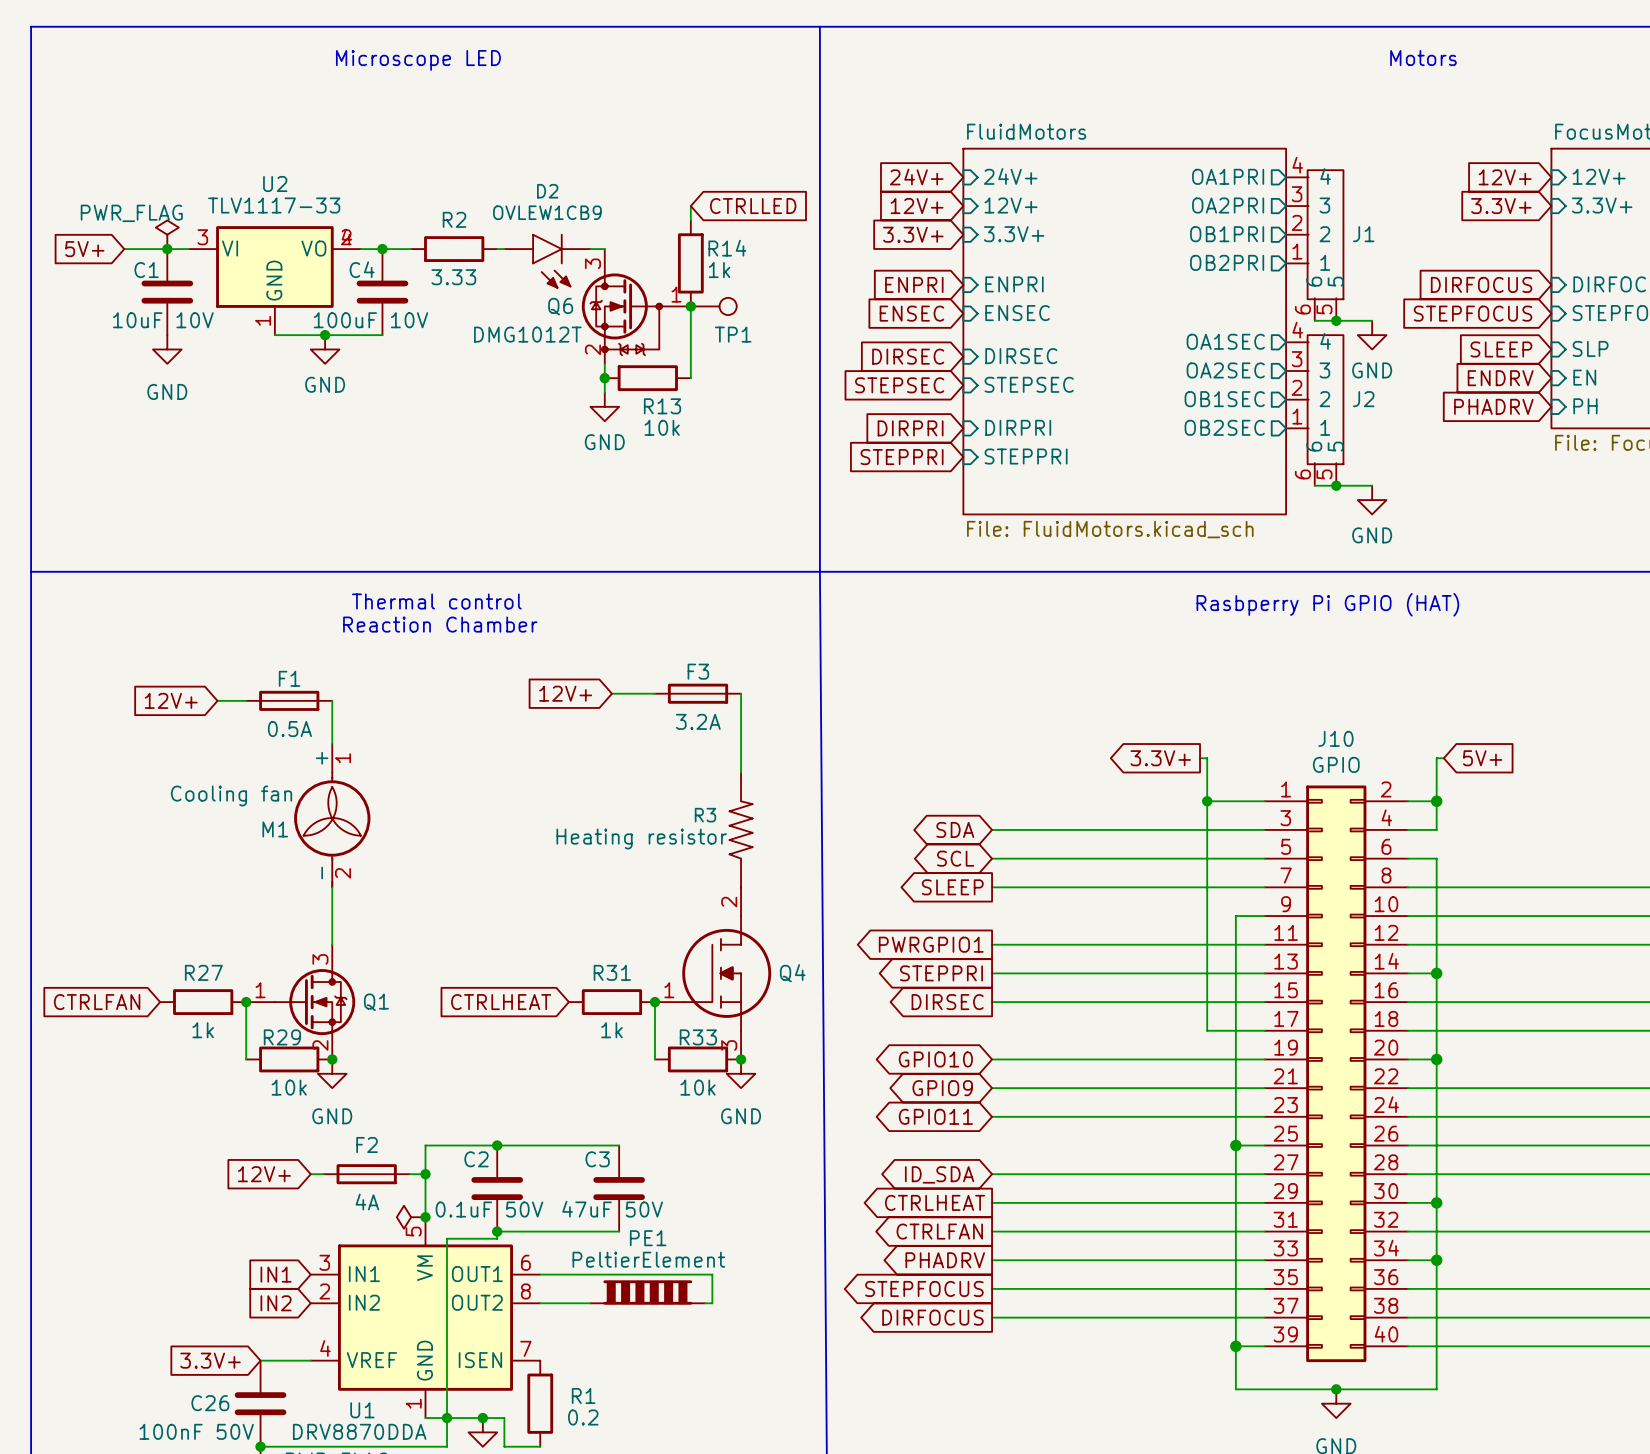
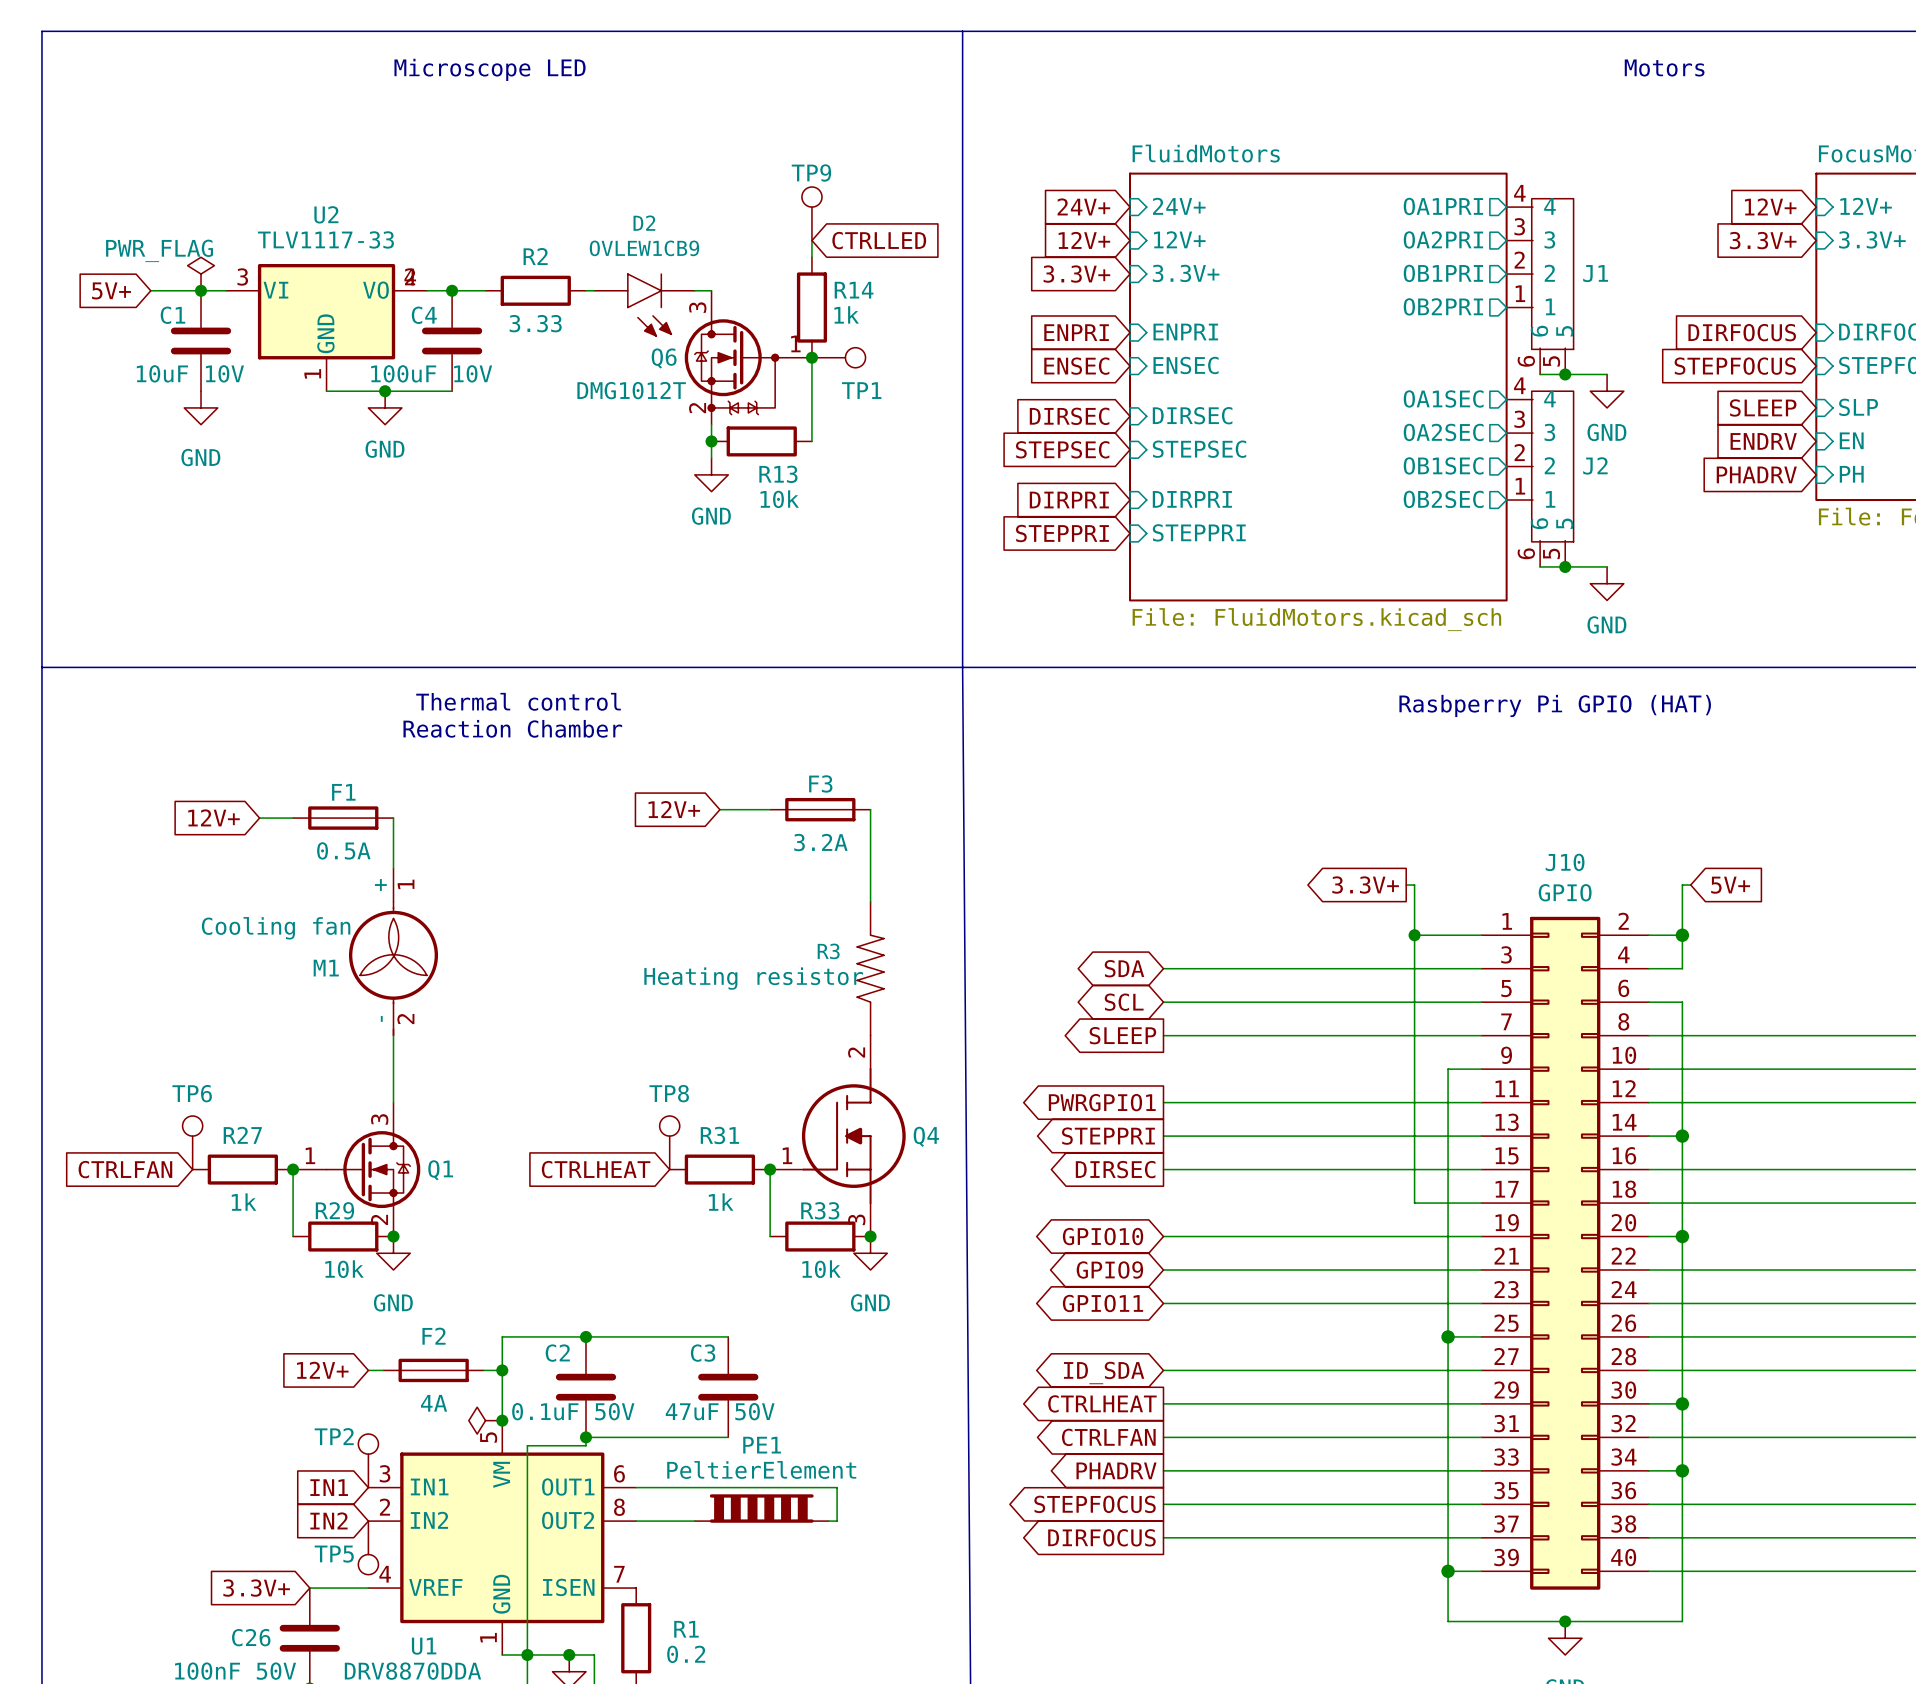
TP9: none -> (811, 213)
TP6: none -> (192, 1142)
TP8: none -> (669, 1142)
TP2: none -> (368, 1460)
TP5: none -> (368, 1547)

